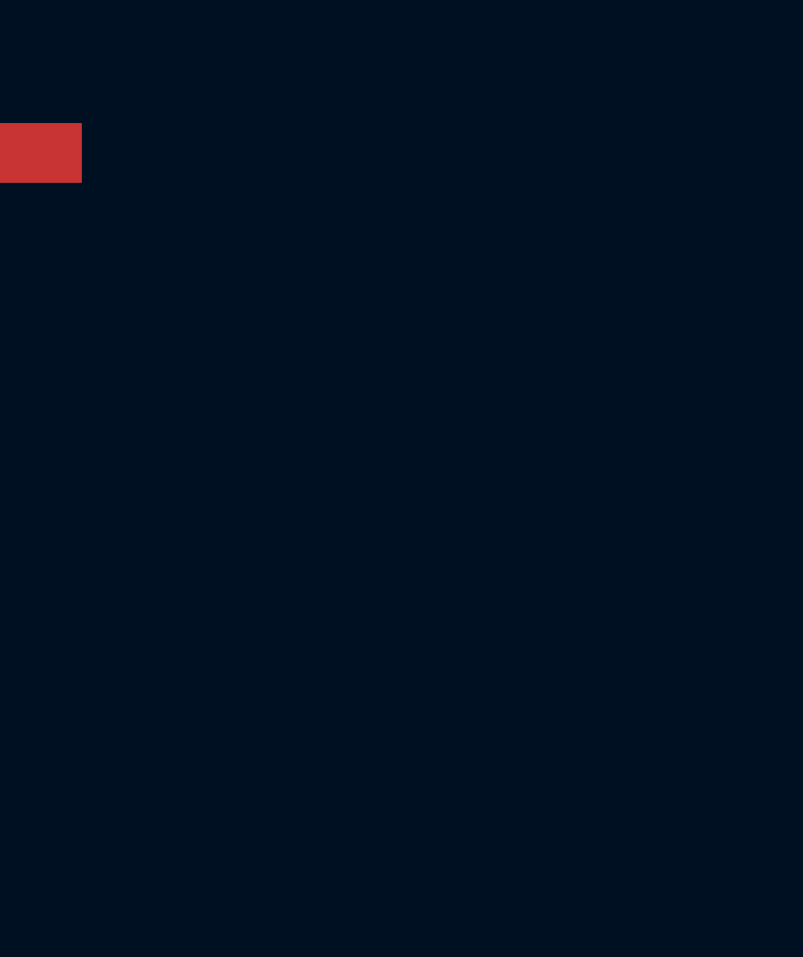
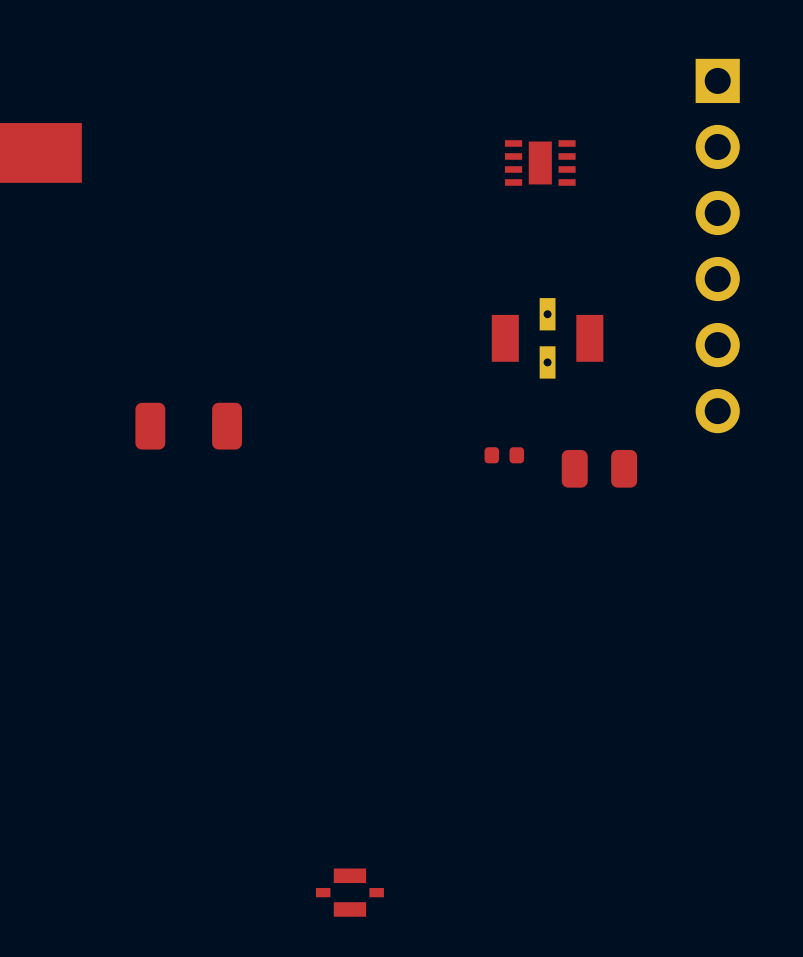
part: none -> (540, 162)
part: none -> (717, 246)
part: none -> (547, 338)
part: none -> (188, 426)
part: none -> (504, 455)
part: none -> (599, 468)
part: none -> (349, 892)

